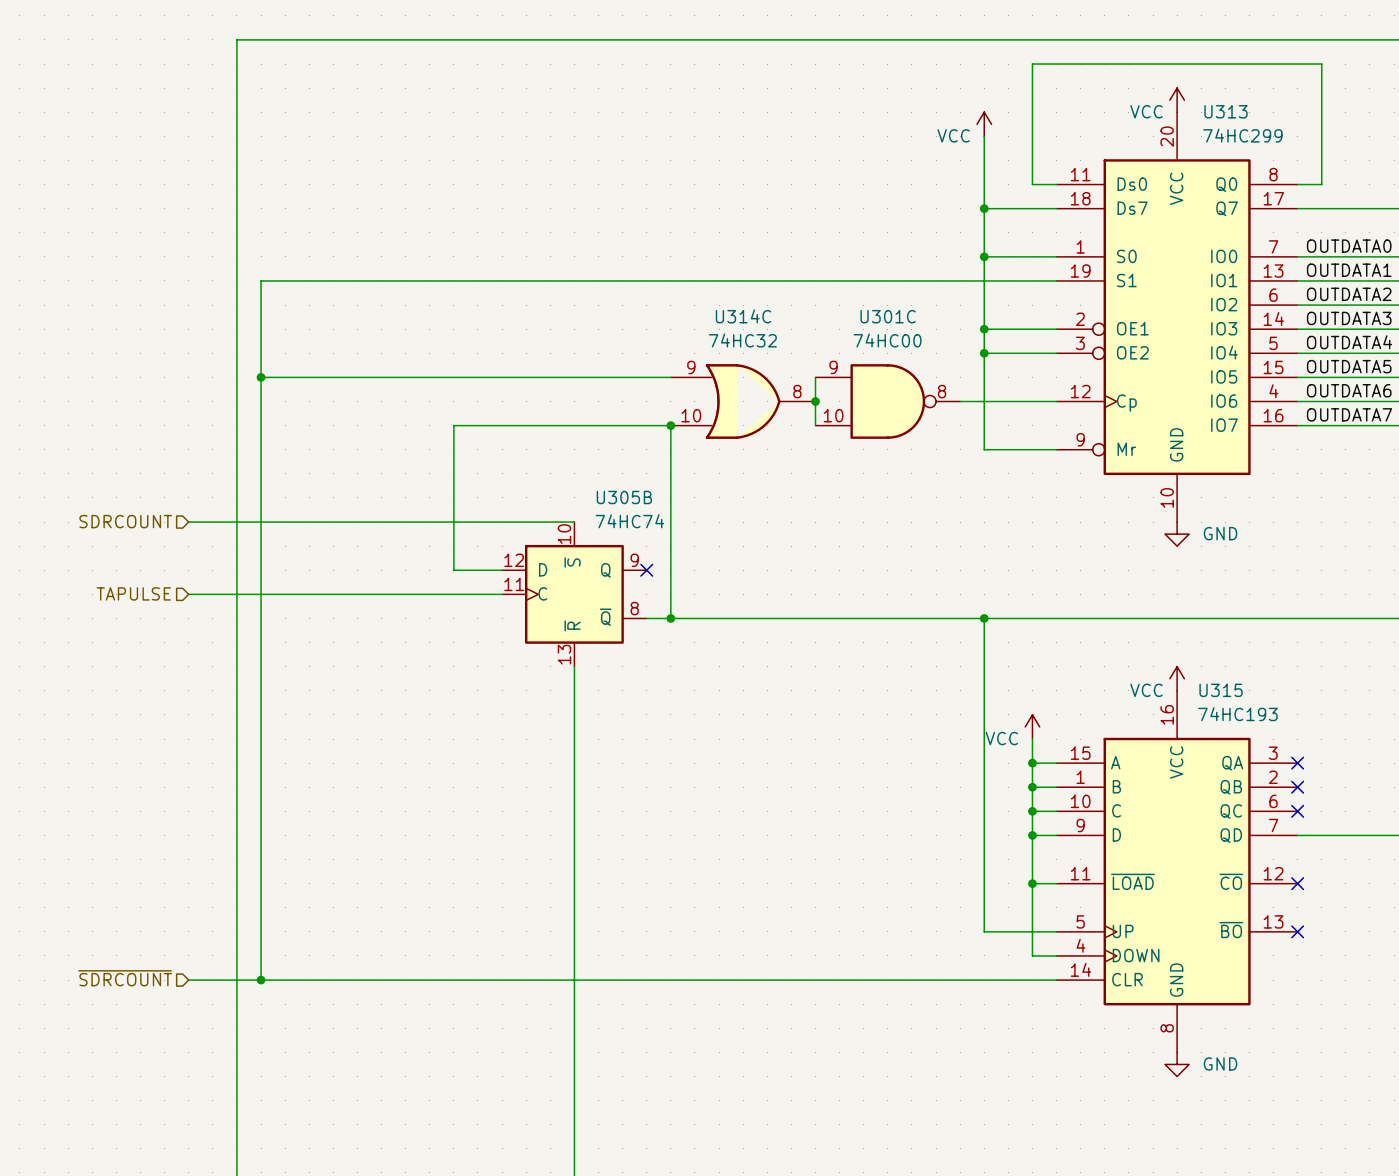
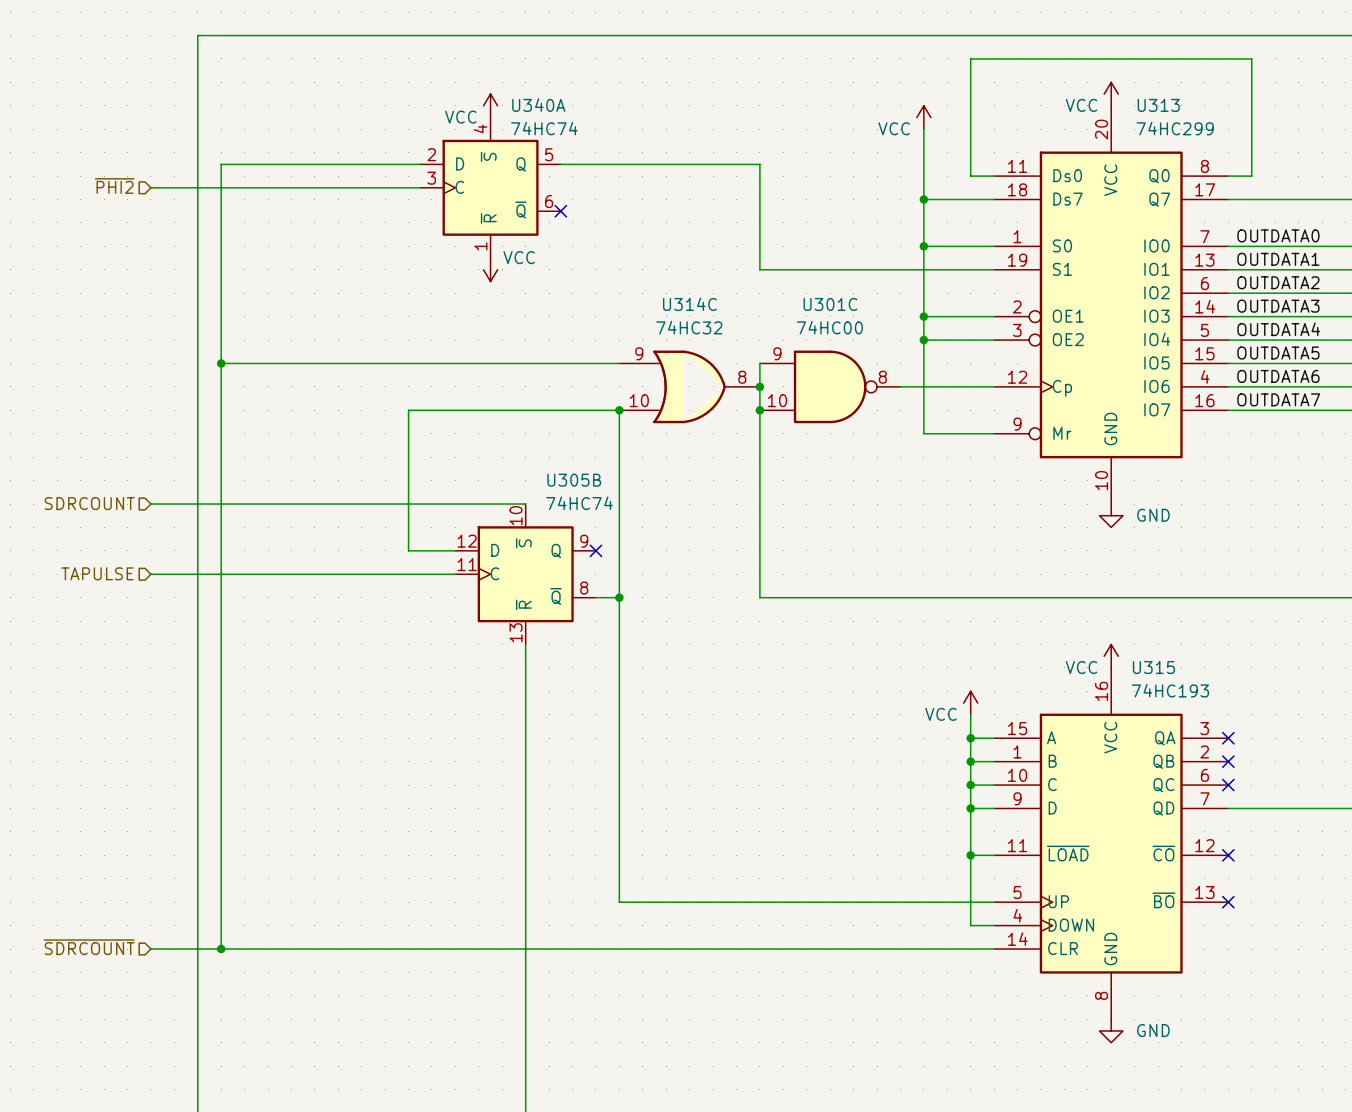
power symbol: none -> VCC (490, 105)
wire: none -> (420, 164) (221, 164) (221, 269)
hierarchical label: none -> ~{PHI2} (114, 186)
wire: none -> (150, 187) (420, 187)
U340A: none -> 74HC74 (490, 187)
no-connect mark: none -> (560, 211)
wire: (261, 280) (815, 280) -> (560, 164) (759, 164) (759, 269)
power symbol: none -> VCC (490, 269)
junction: none -> (759, 410)
wire: (670, 618) (815, 618) -> (759, 410) (759, 597)
wire: (984, 618) (984, 931) -> (619, 597) (619, 902) (923, 902)
junction: (984, 618) -> none

